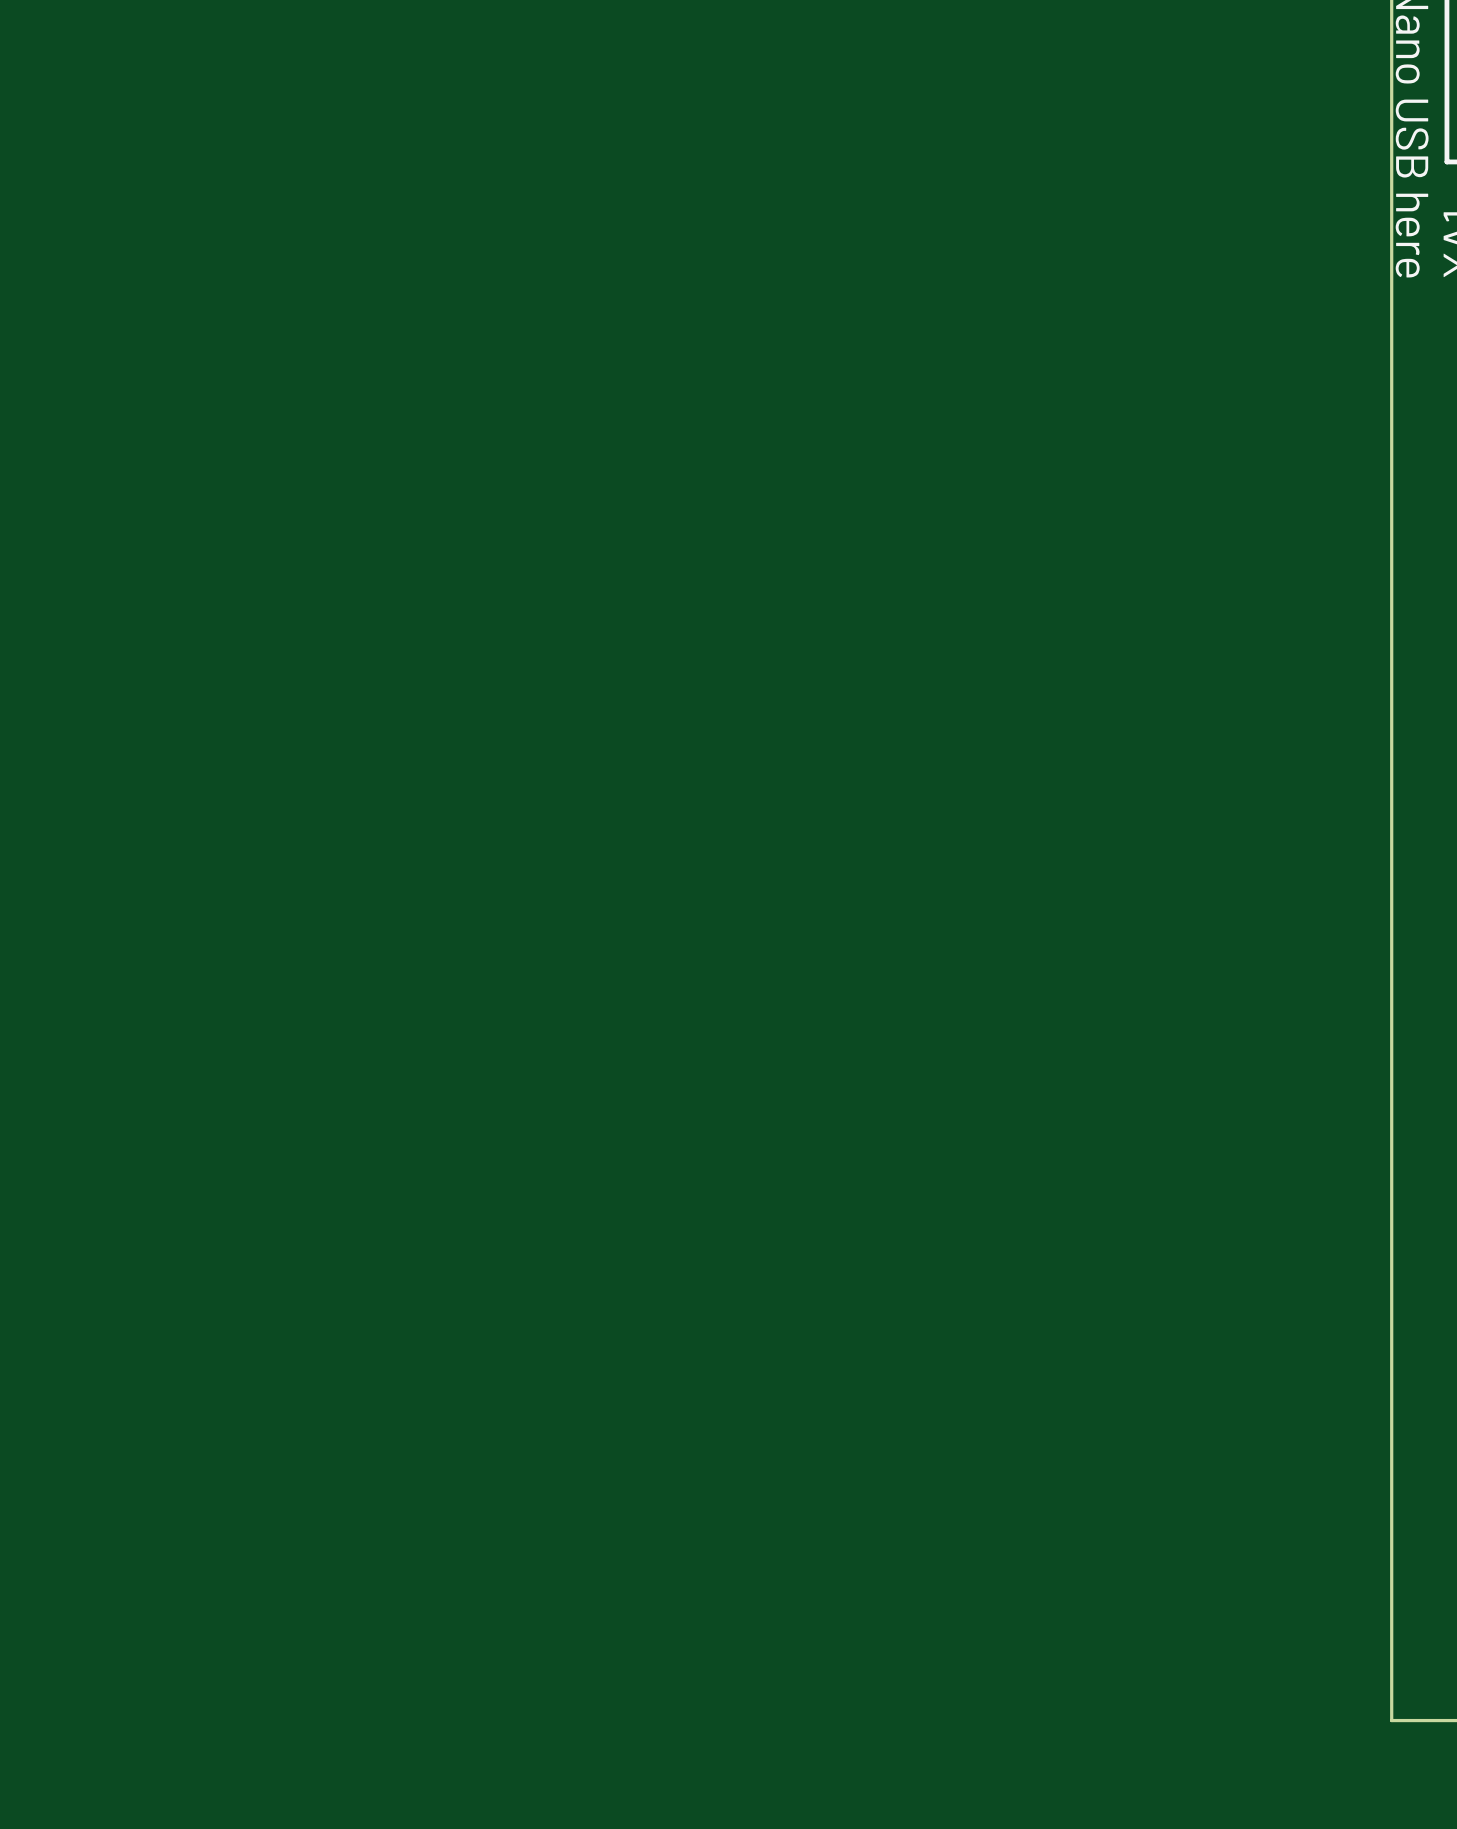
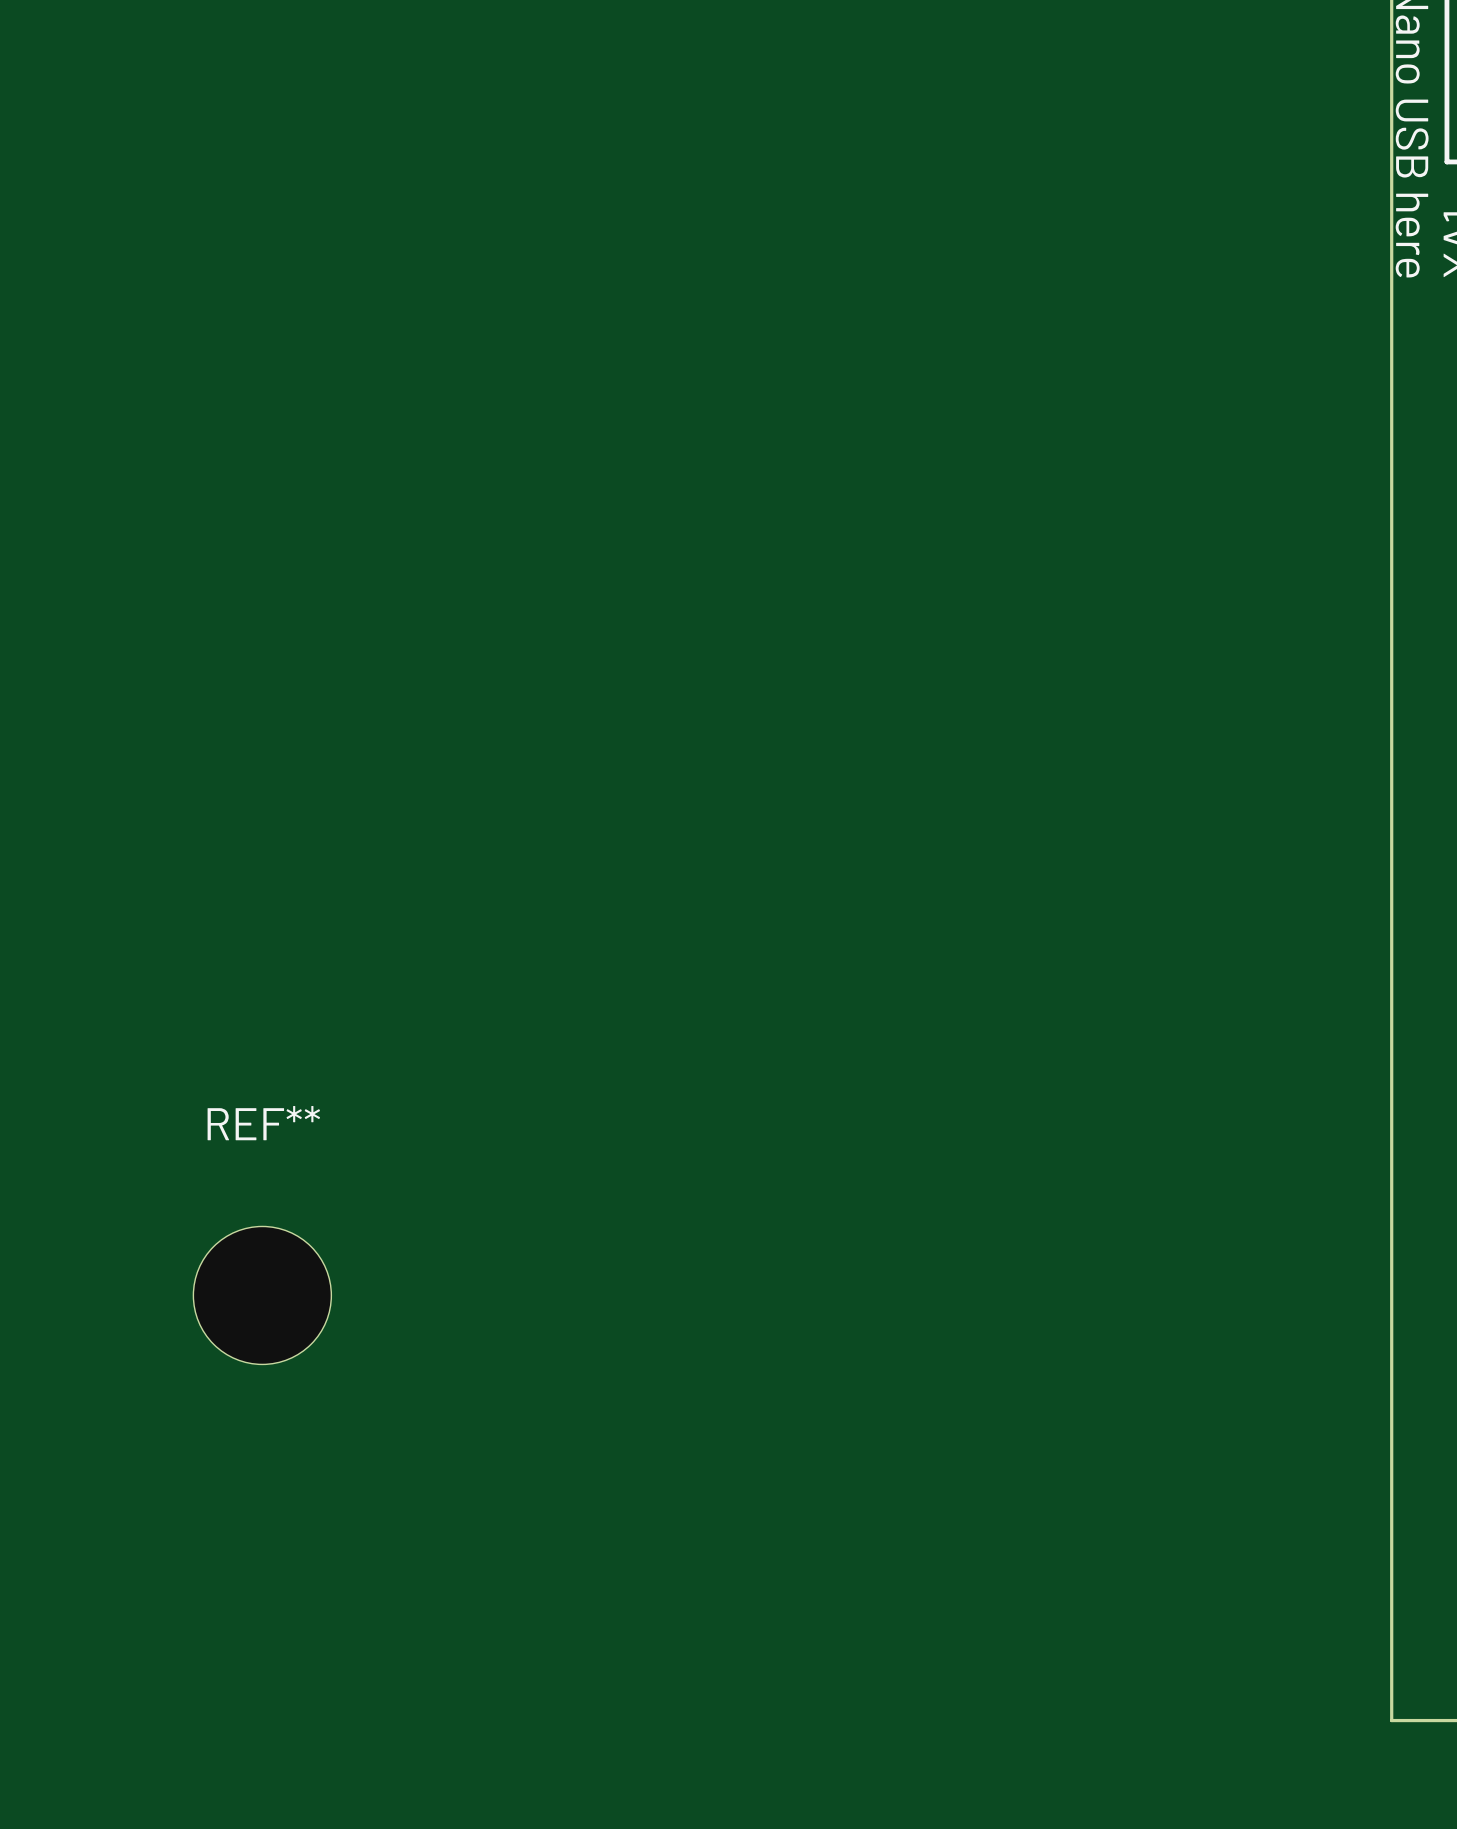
REF**: none -> (262, 1295)

